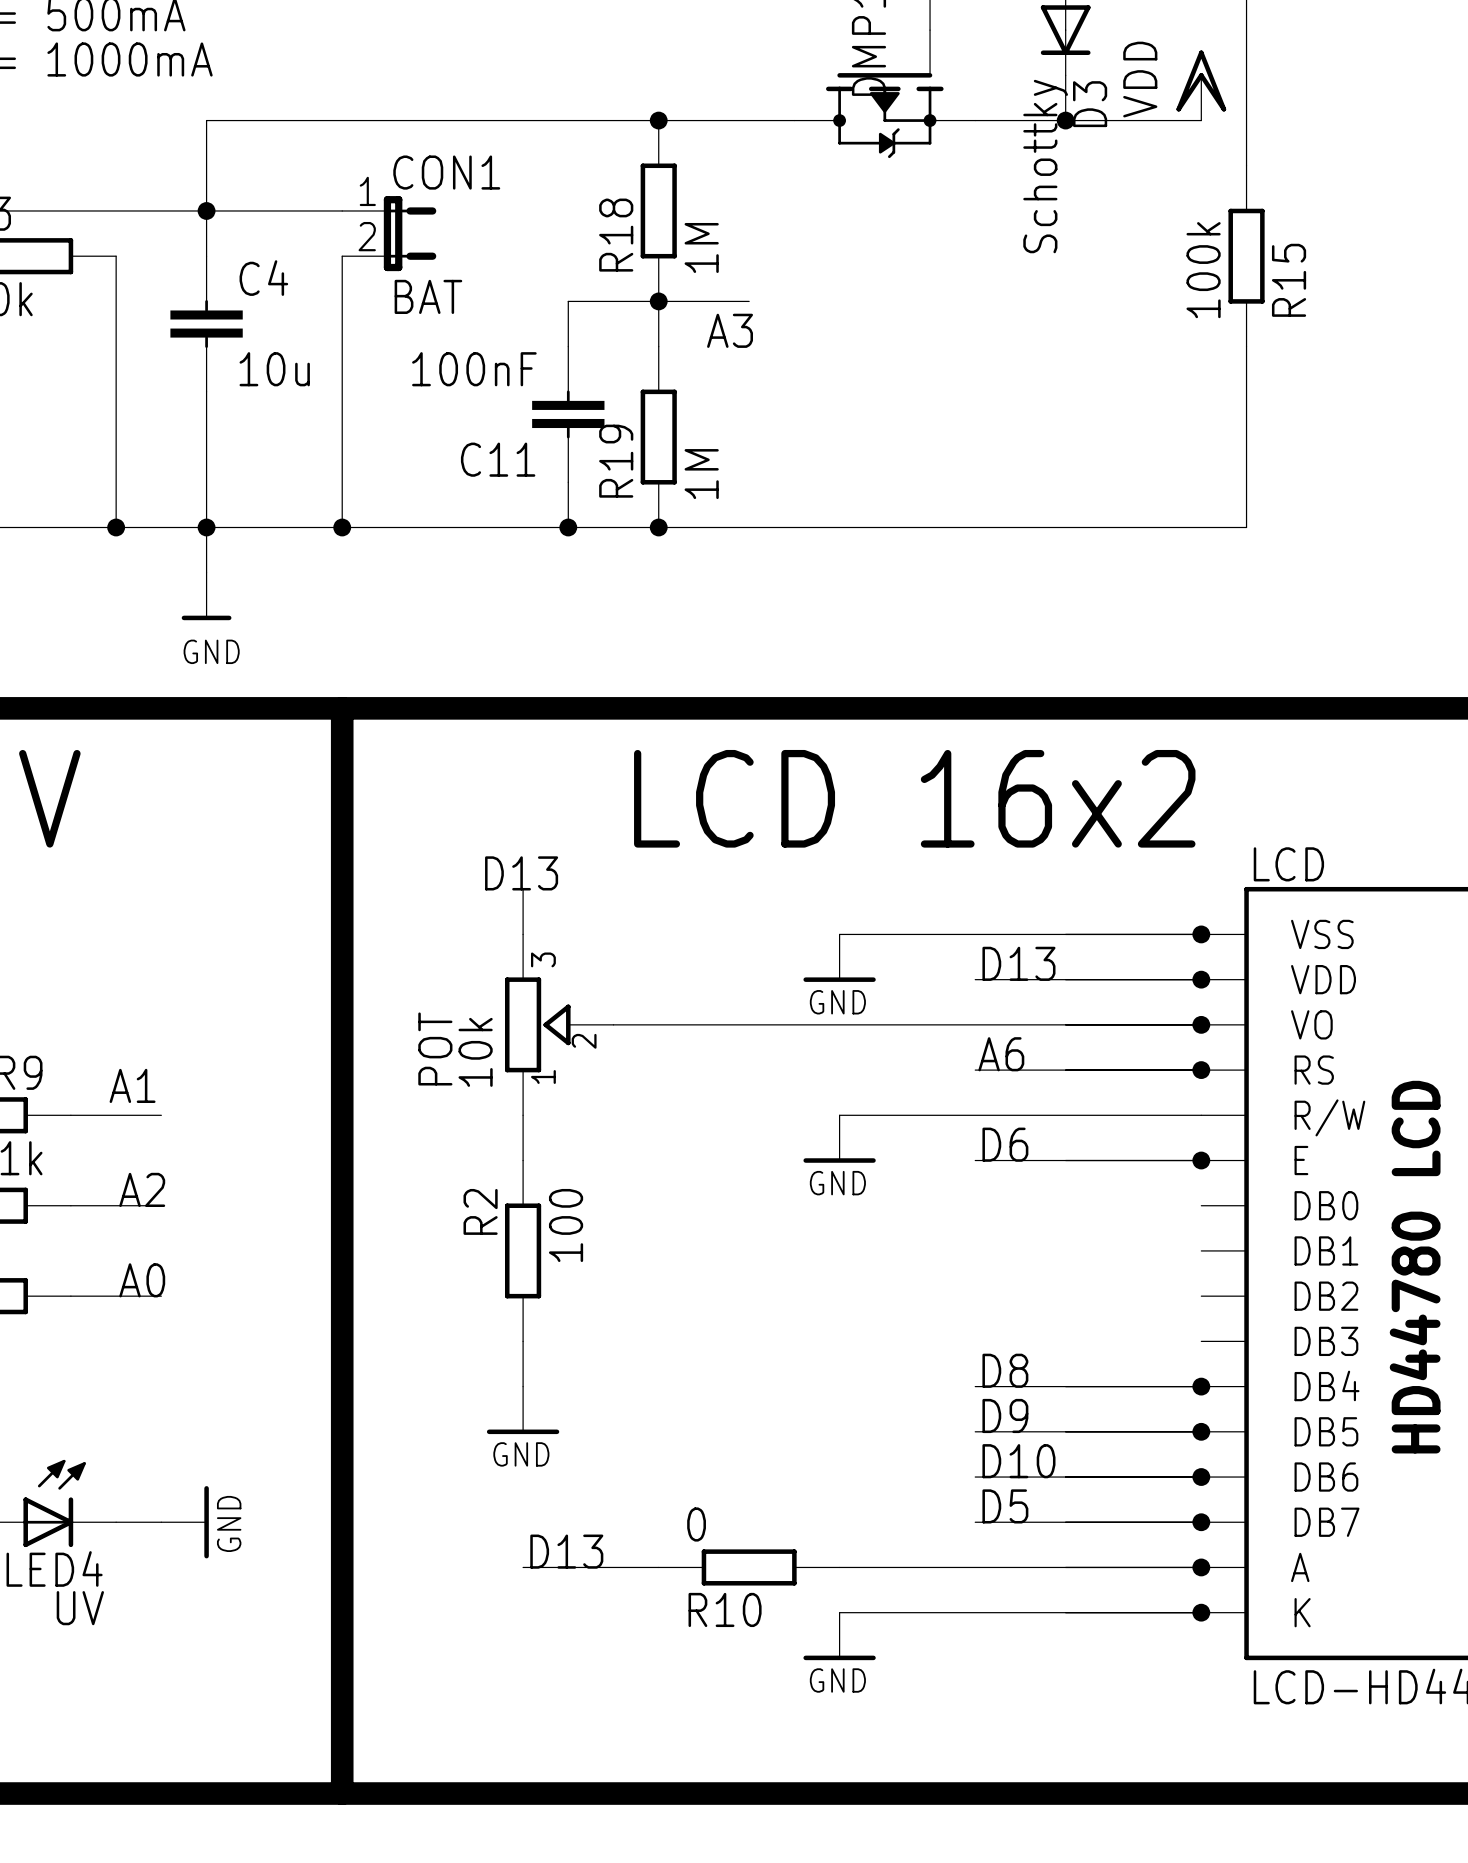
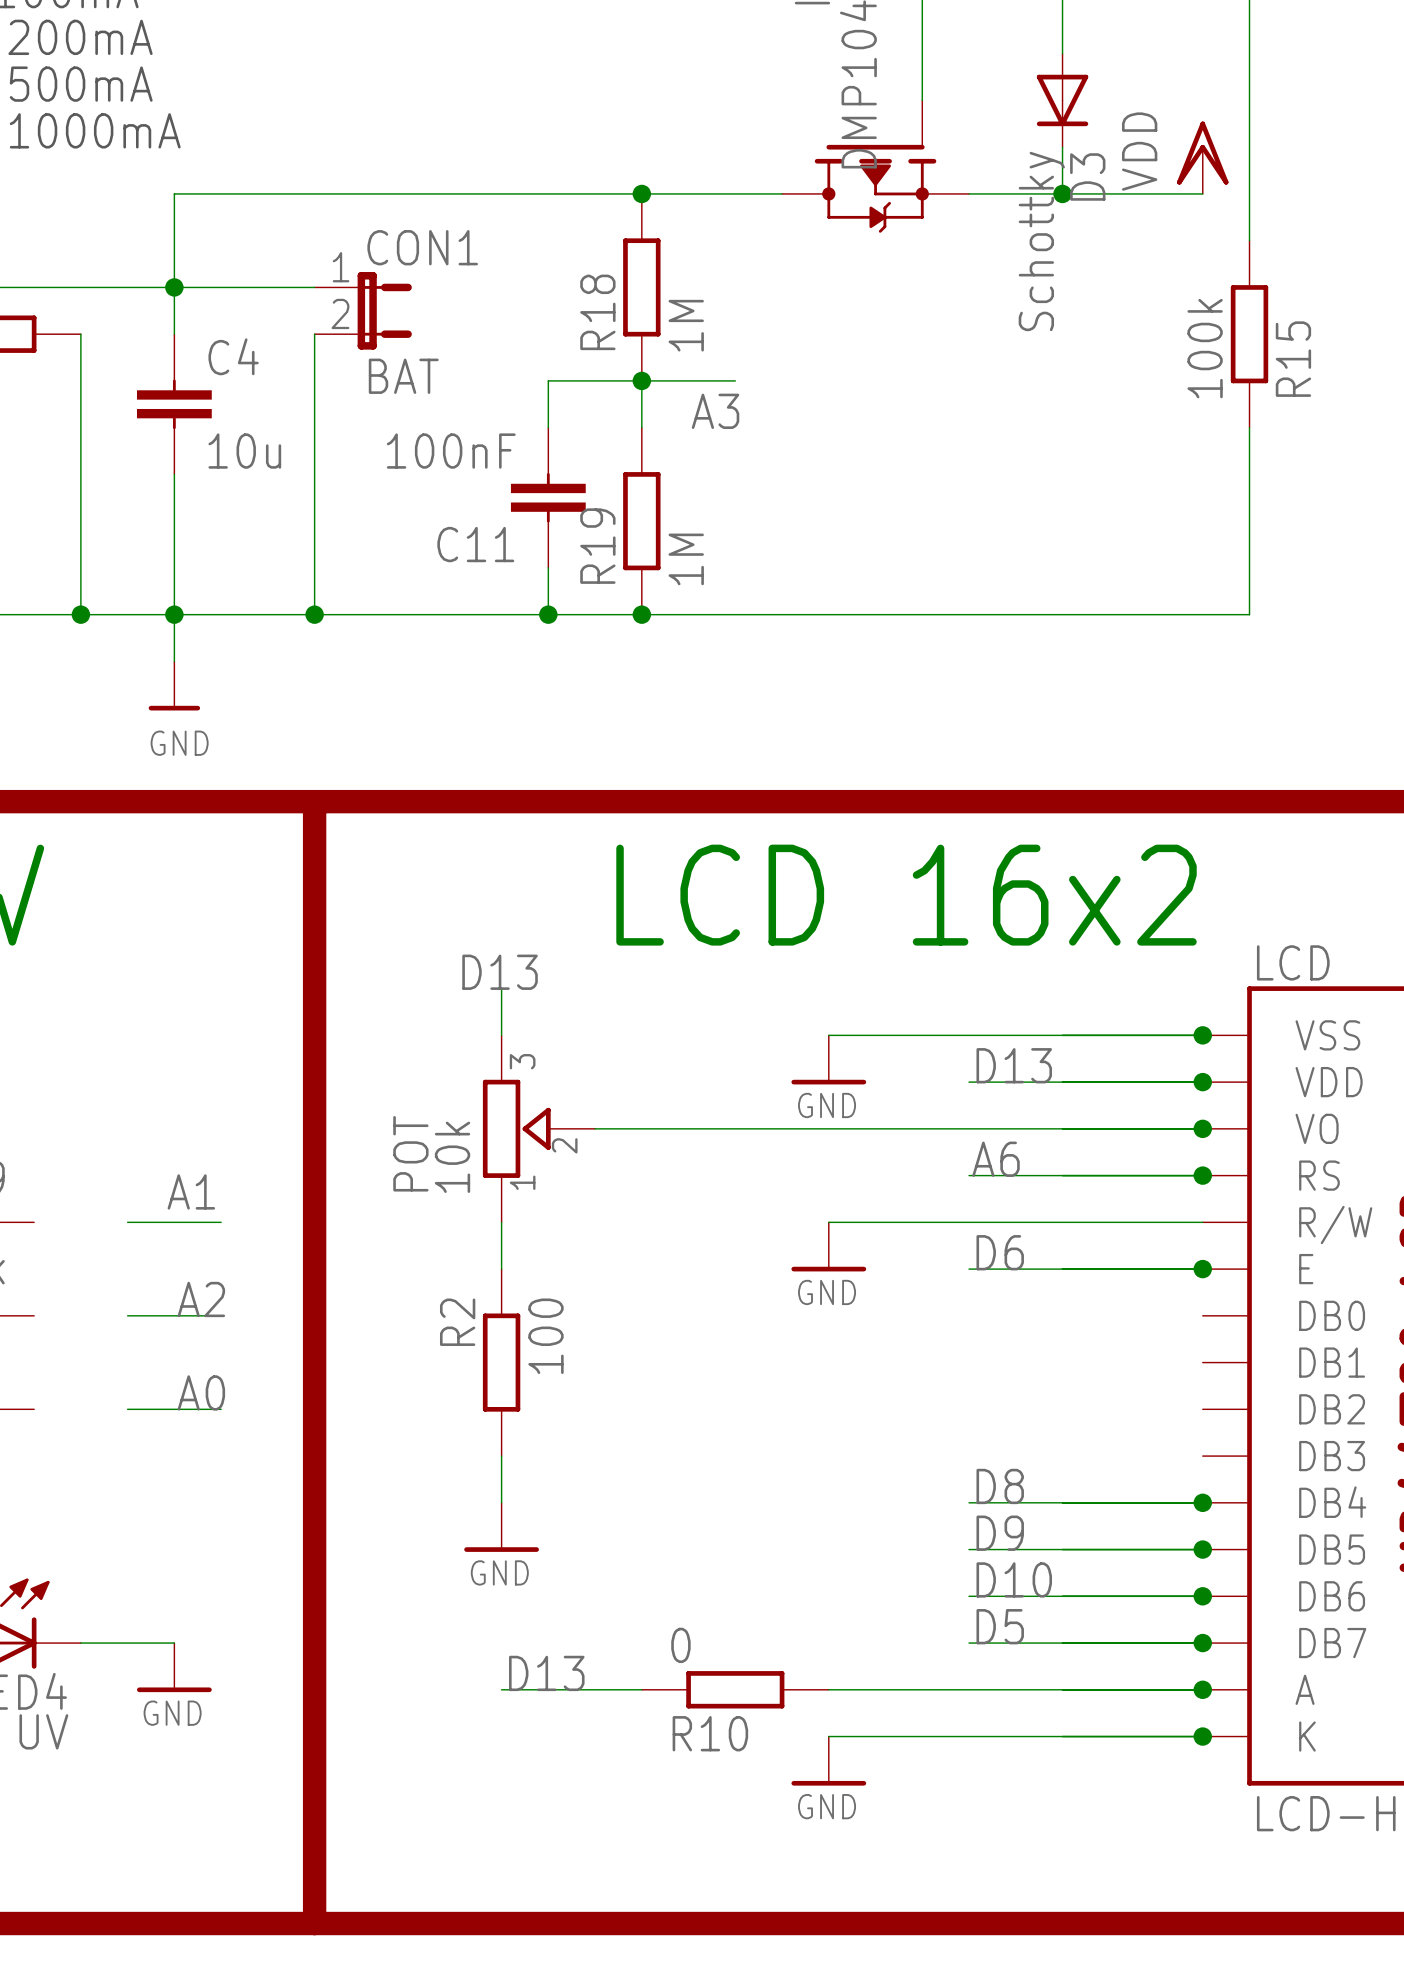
label position: A1 (132, 1085) -> A1 (191, 1191)
wire: (70, 1115) (161, 1115) -> (221, 1222) (127, 1222)
label position: A2 (142, 1189) -> A2 (201, 1299)
wire: (70, 1205) (161, 1205) -> (221, 1315) (127, 1315)
label position: A0 (142, 1280) -> A0 (201, 1392)
wire: (70, 1296) (161, 1296) -> (221, 1409) (127, 1409)
power symbol rotation: 0° (206, 1522) -> 90° clockwise (174, 1689)

